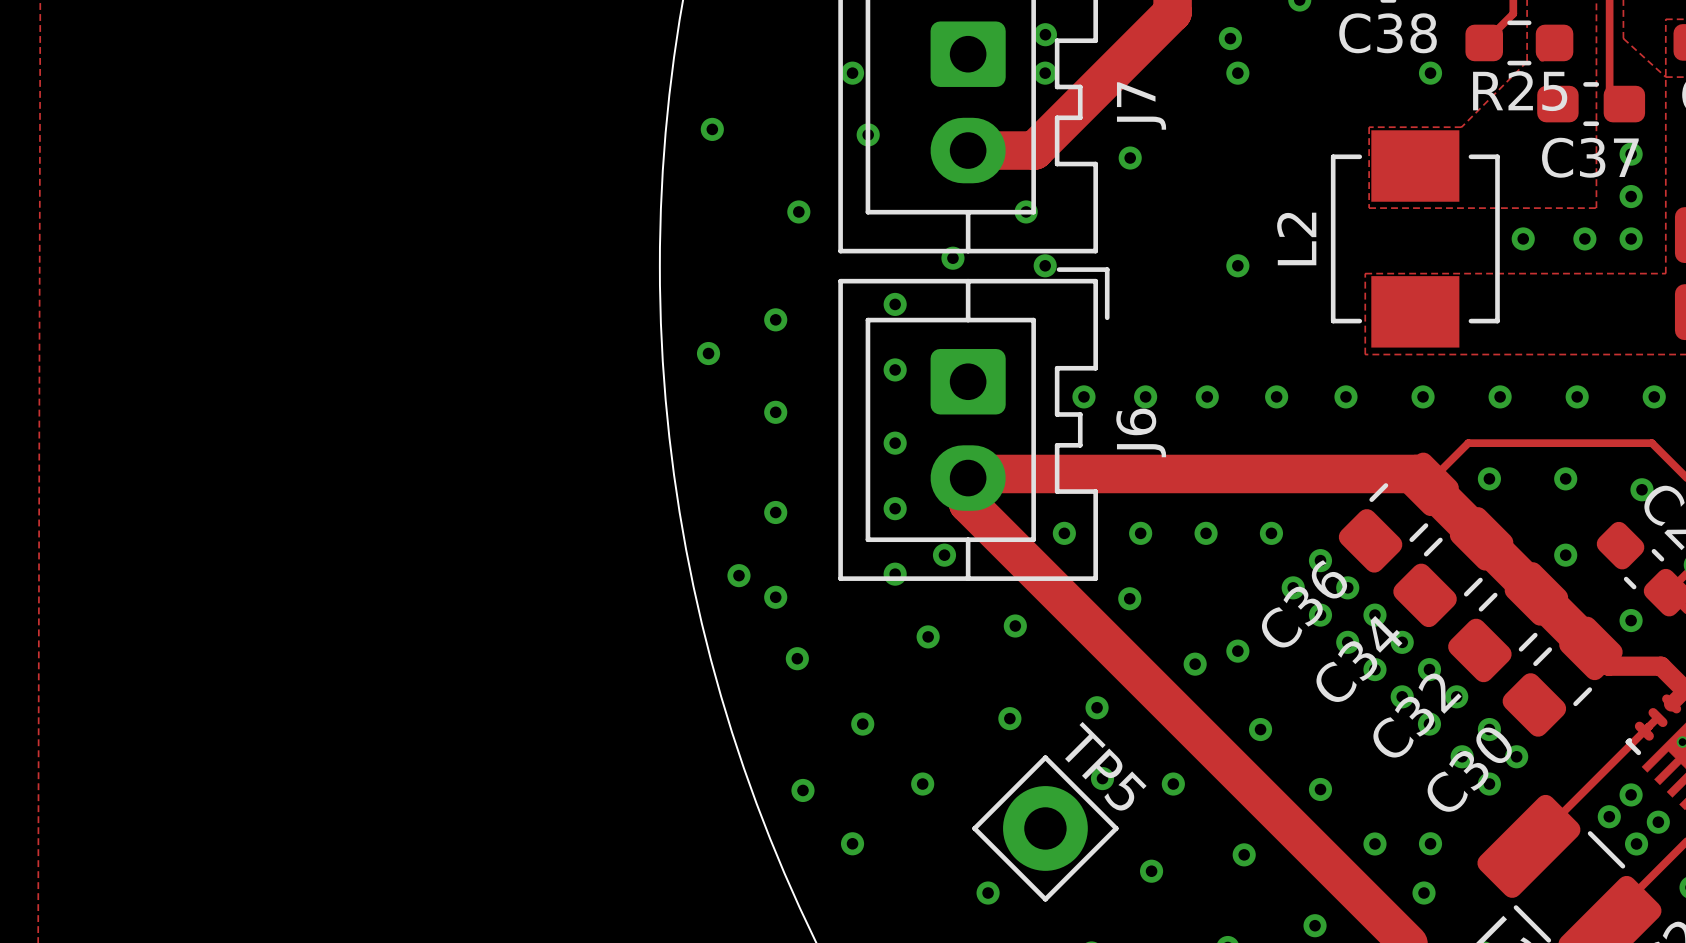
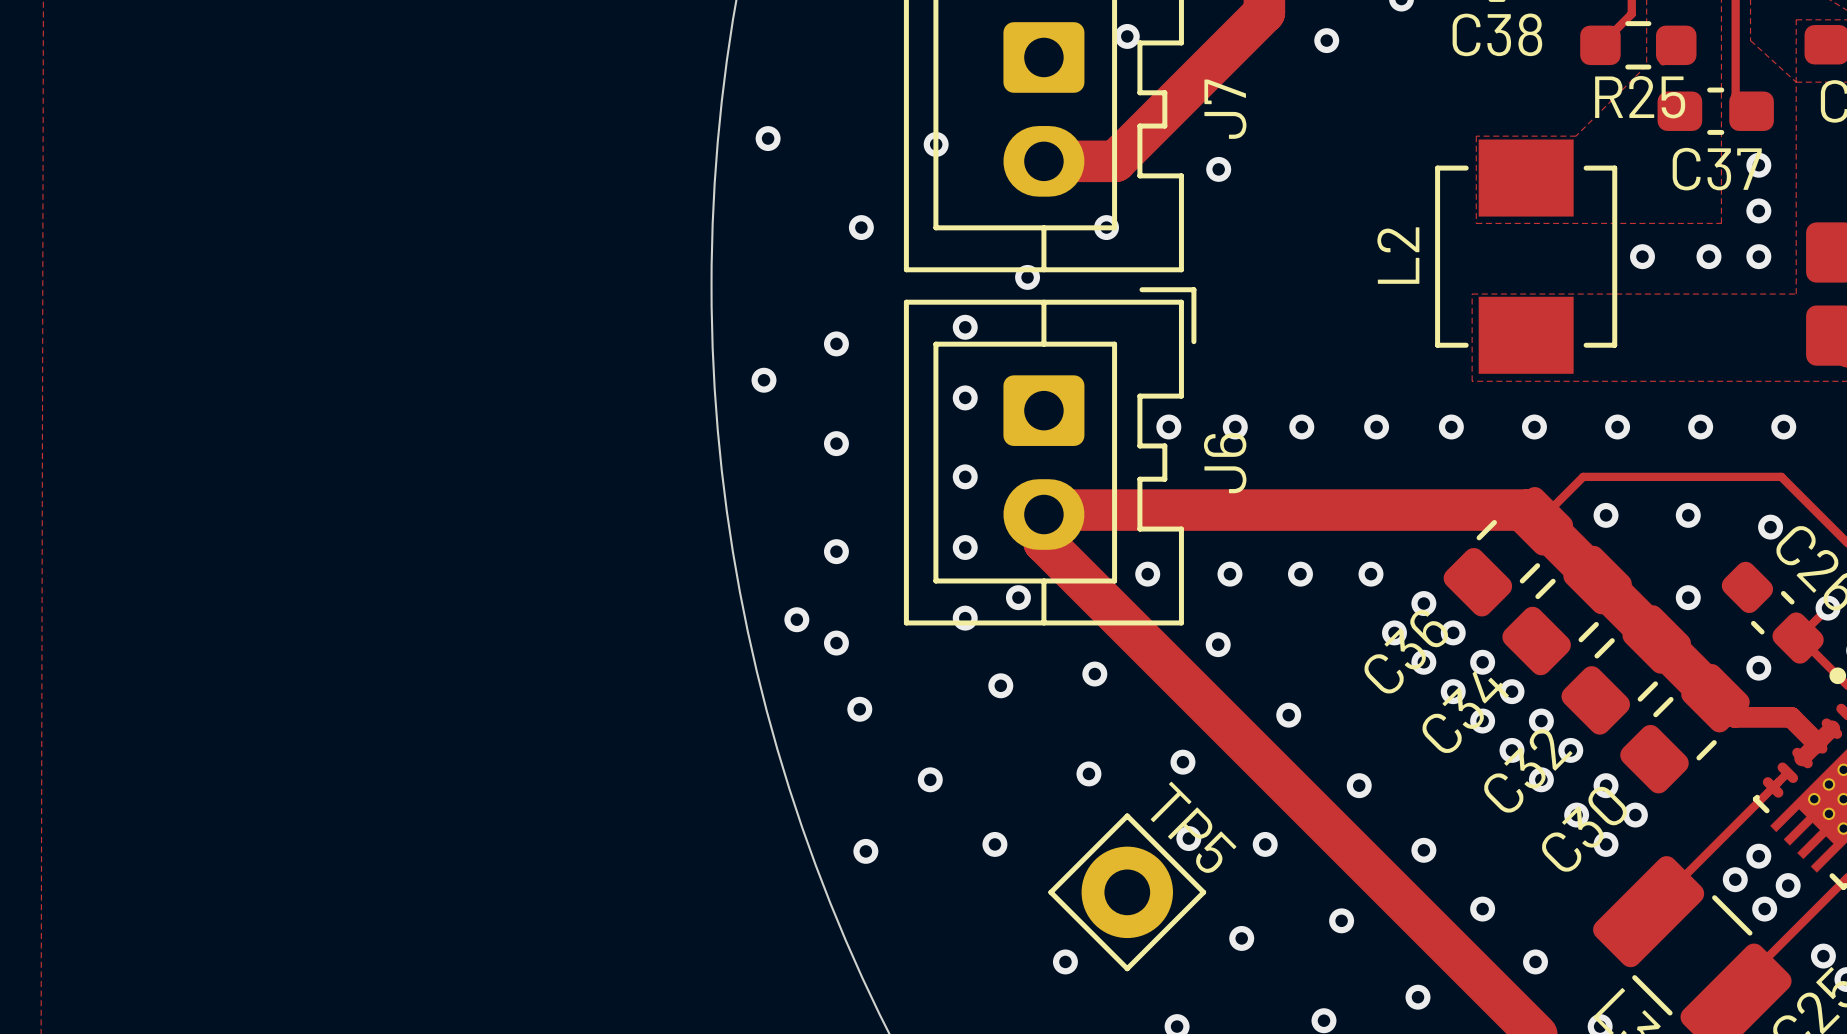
via: (852, 73) -> none
via: (1045, 73) -> none
via: (1237, 73) -> none
via: (1430, 73) -> none
via: (1045, 265) -> none
via: (1237, 265) -> none
via: (1237, 651) -> none
via: (852, 843) -> none
via: (1430, 843) -> none

